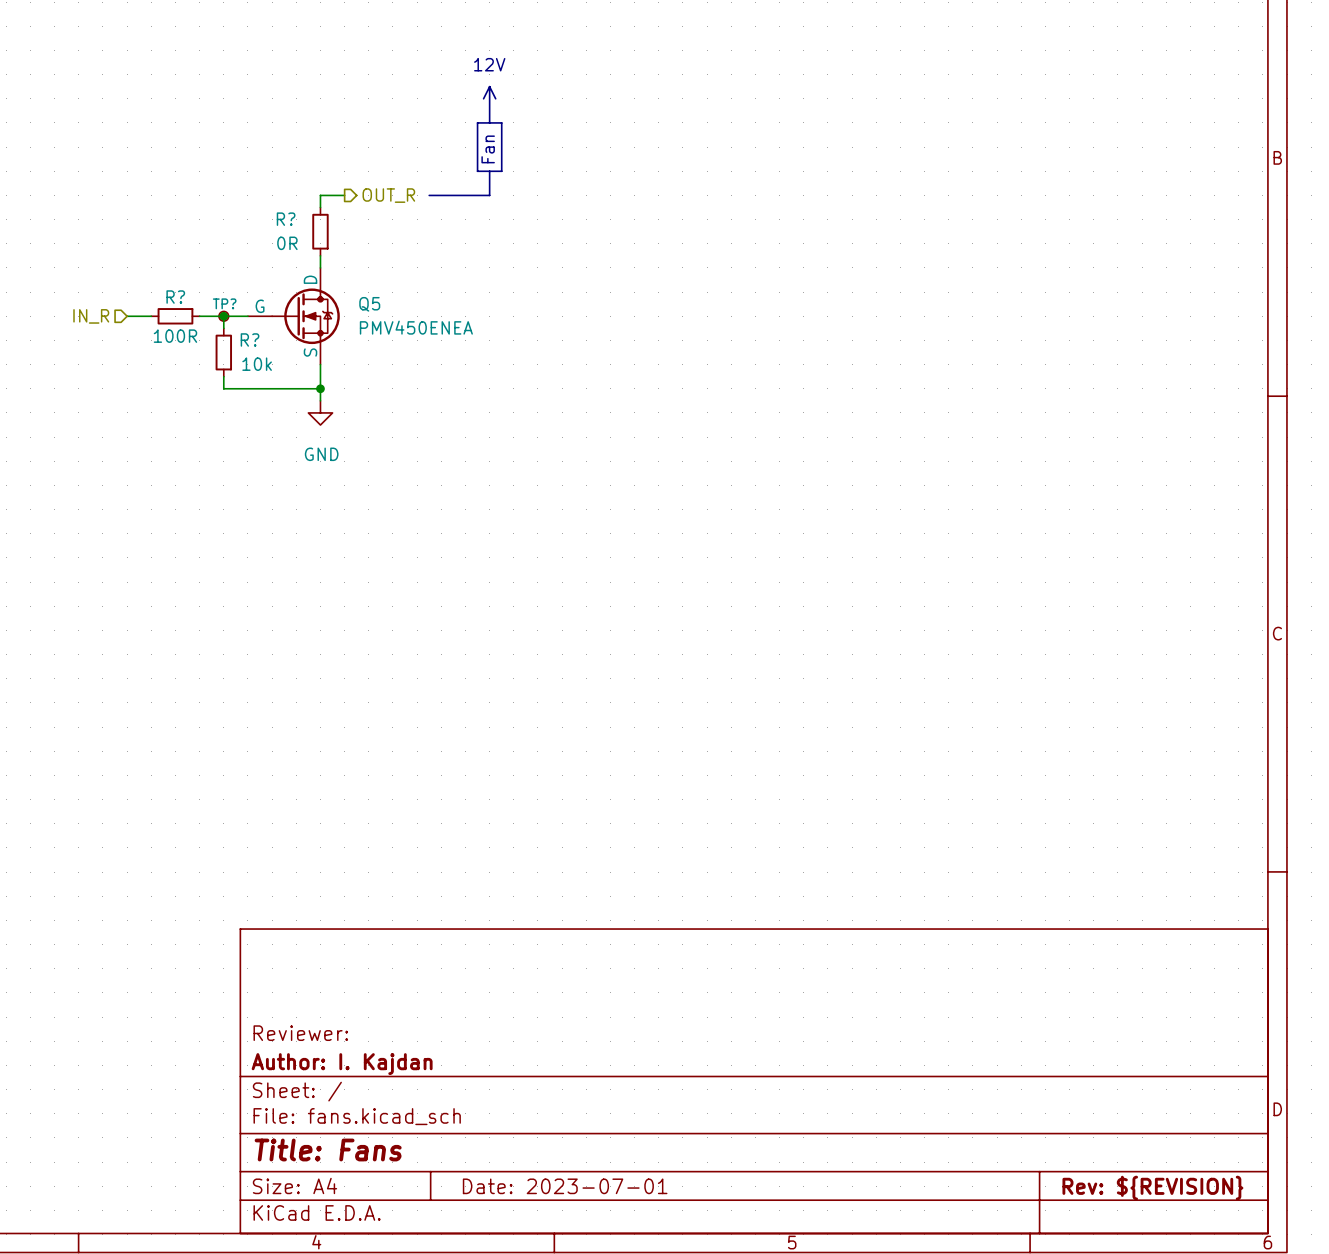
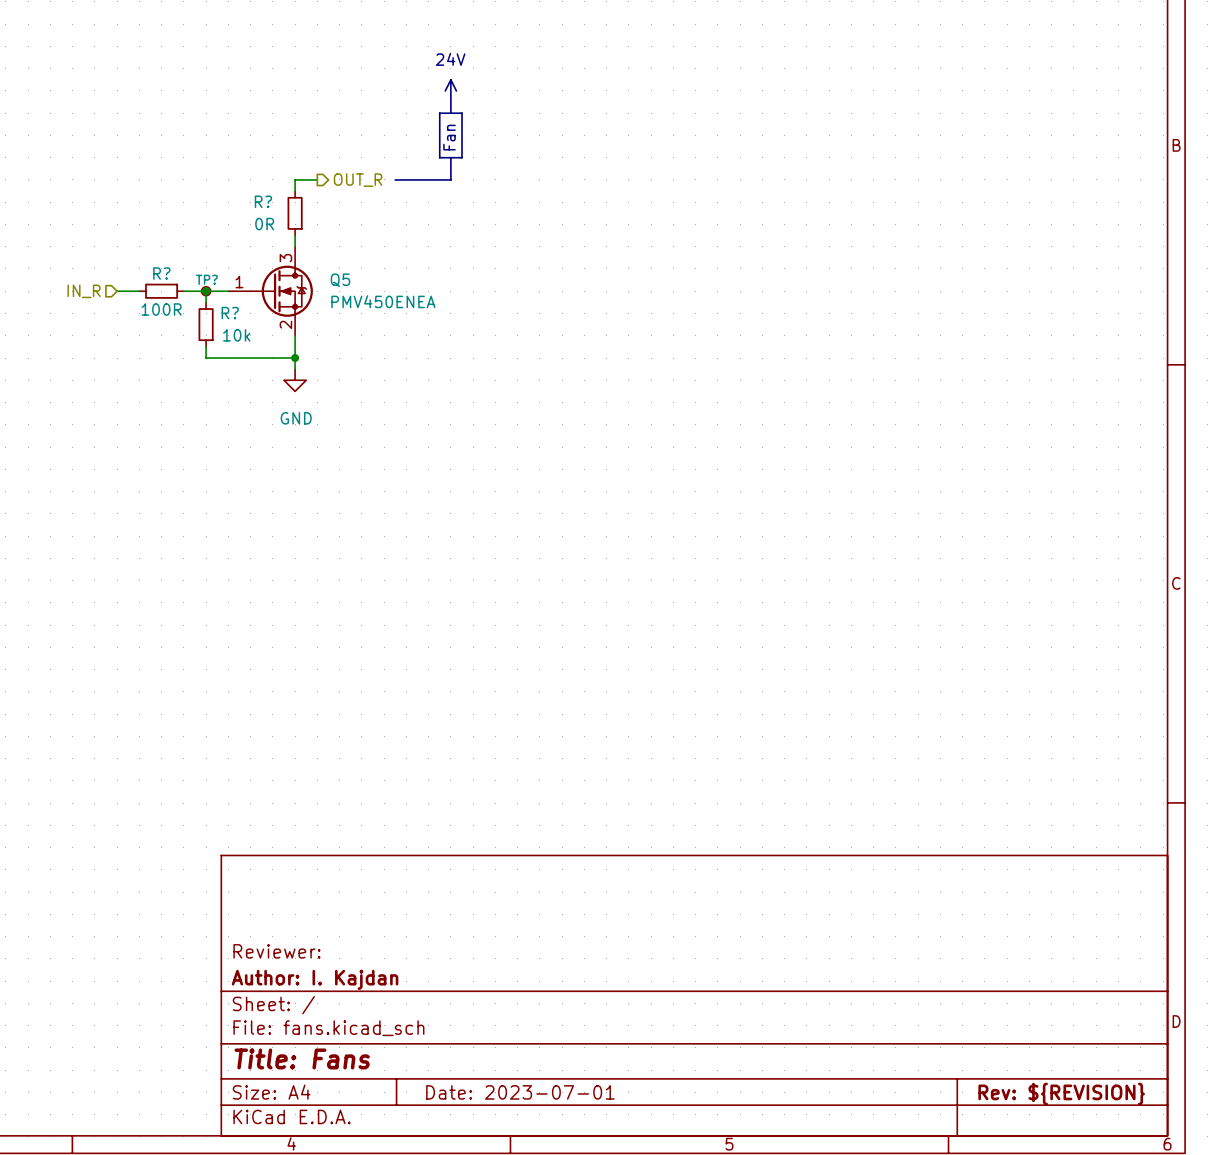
text: 12V (489, 64) -> 24V (450, 59)
Q5 pin name: D (310, 279) -> none
Q5 pin number: none -> 3 (285, 258)
Q5 pin name: G (260, 306) -> none
Q5 pin number: none -> 1 (239, 282)
Q5 pin name: S (310, 352) -> none
Q5 pin number: none -> 2 (285, 324)

